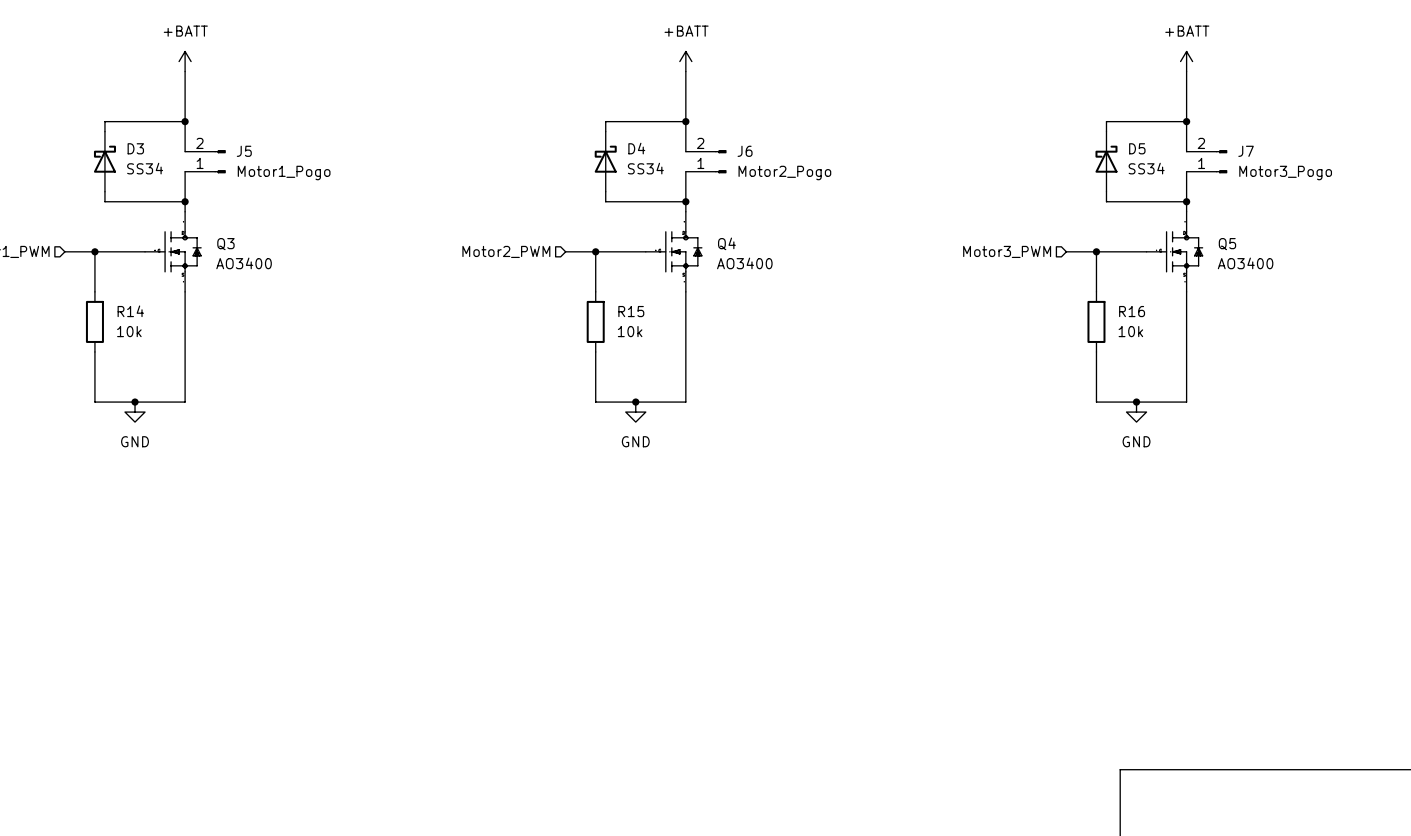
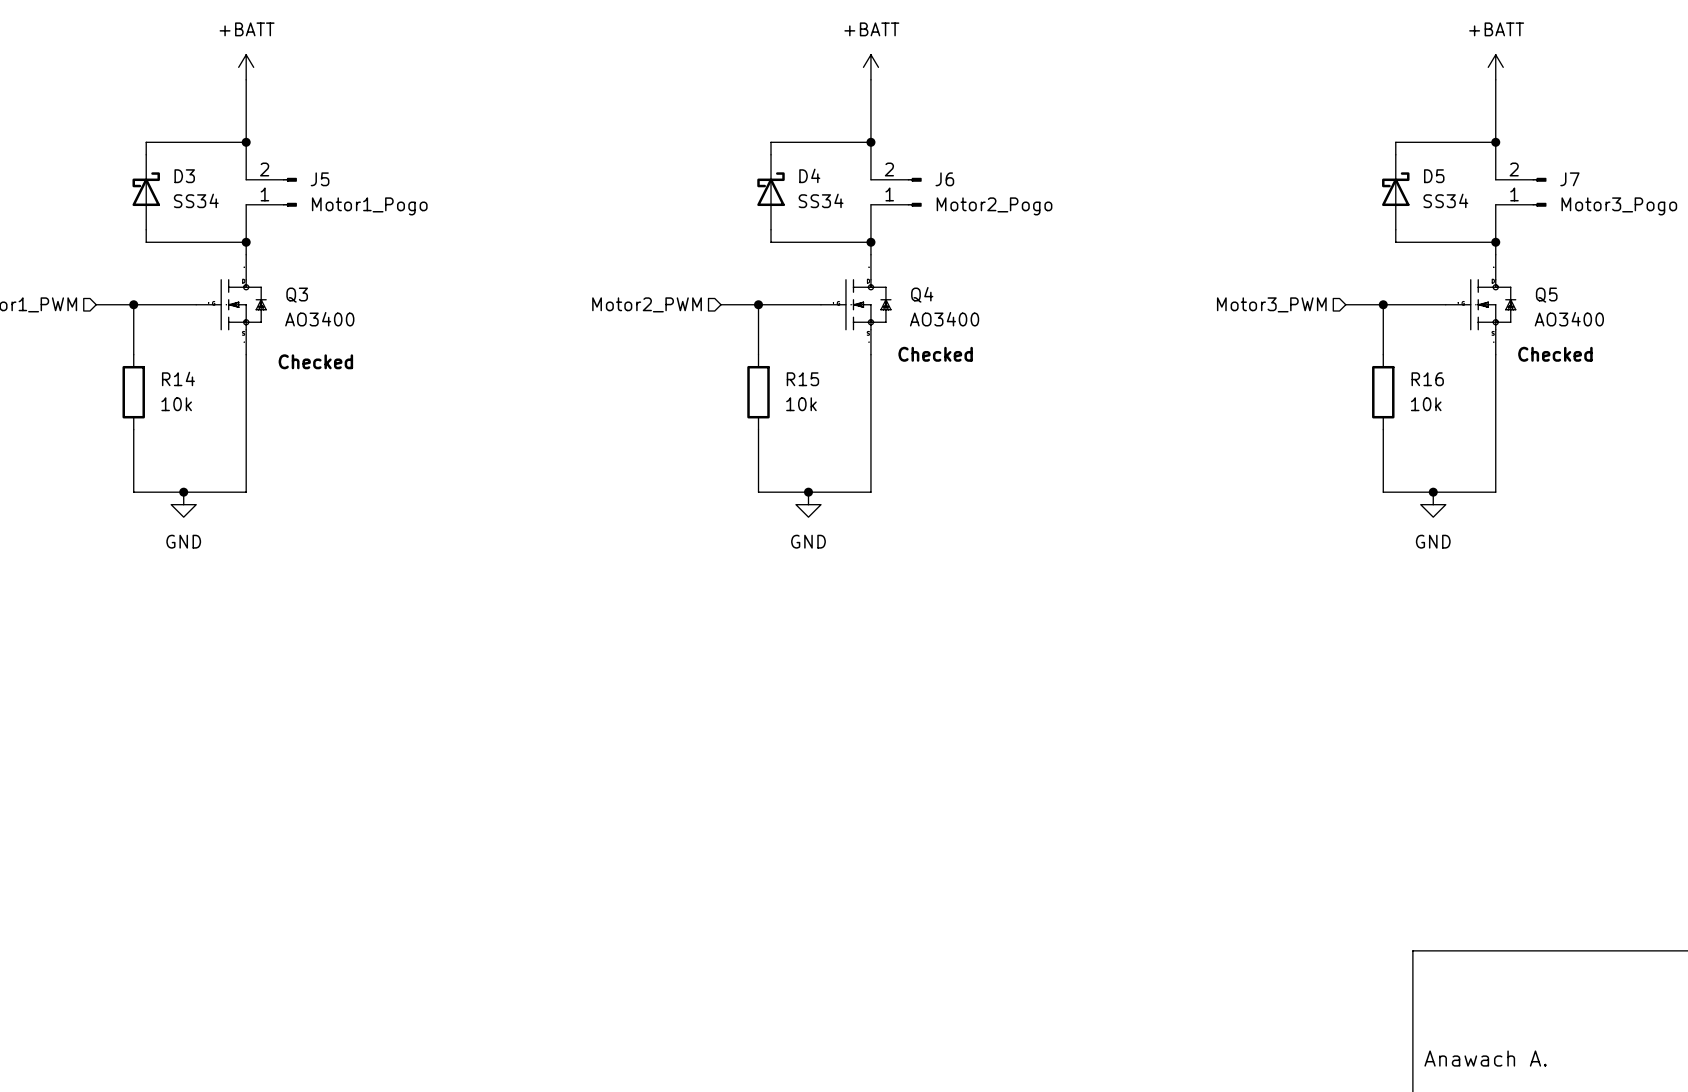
text: none -> Checked (935, 354)
text: none -> Checked (1555, 354)
text: none -> Checked (315, 361)

